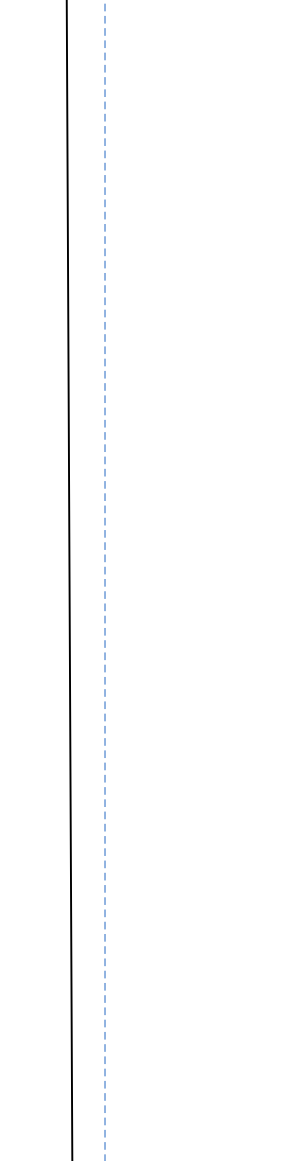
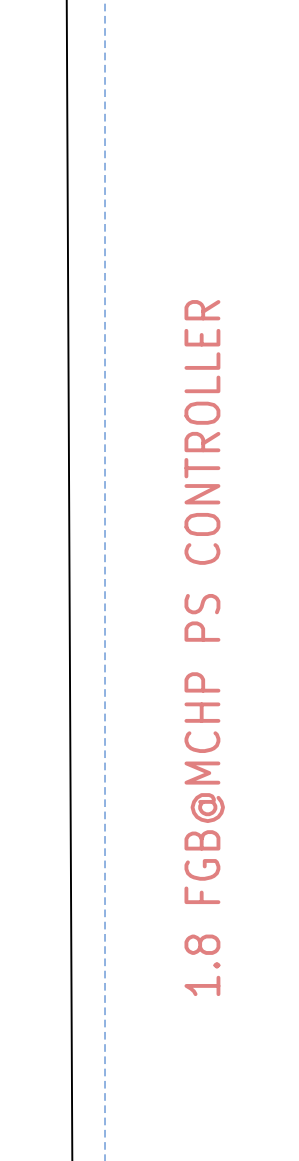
text: none -> 1.8 FGB@MCHP PS CONTROLLER (204, 648)

